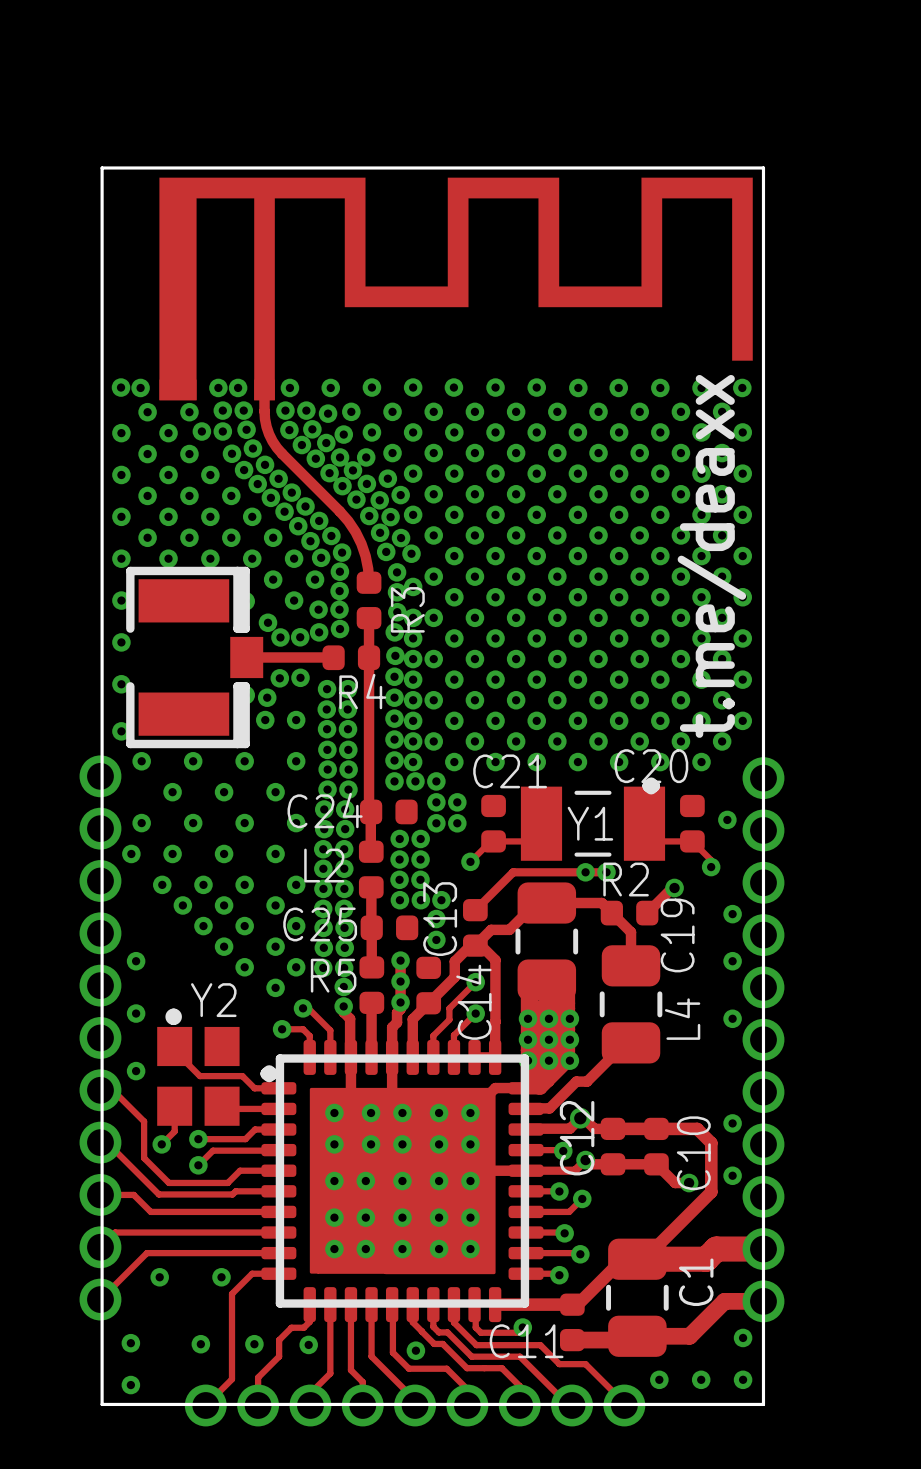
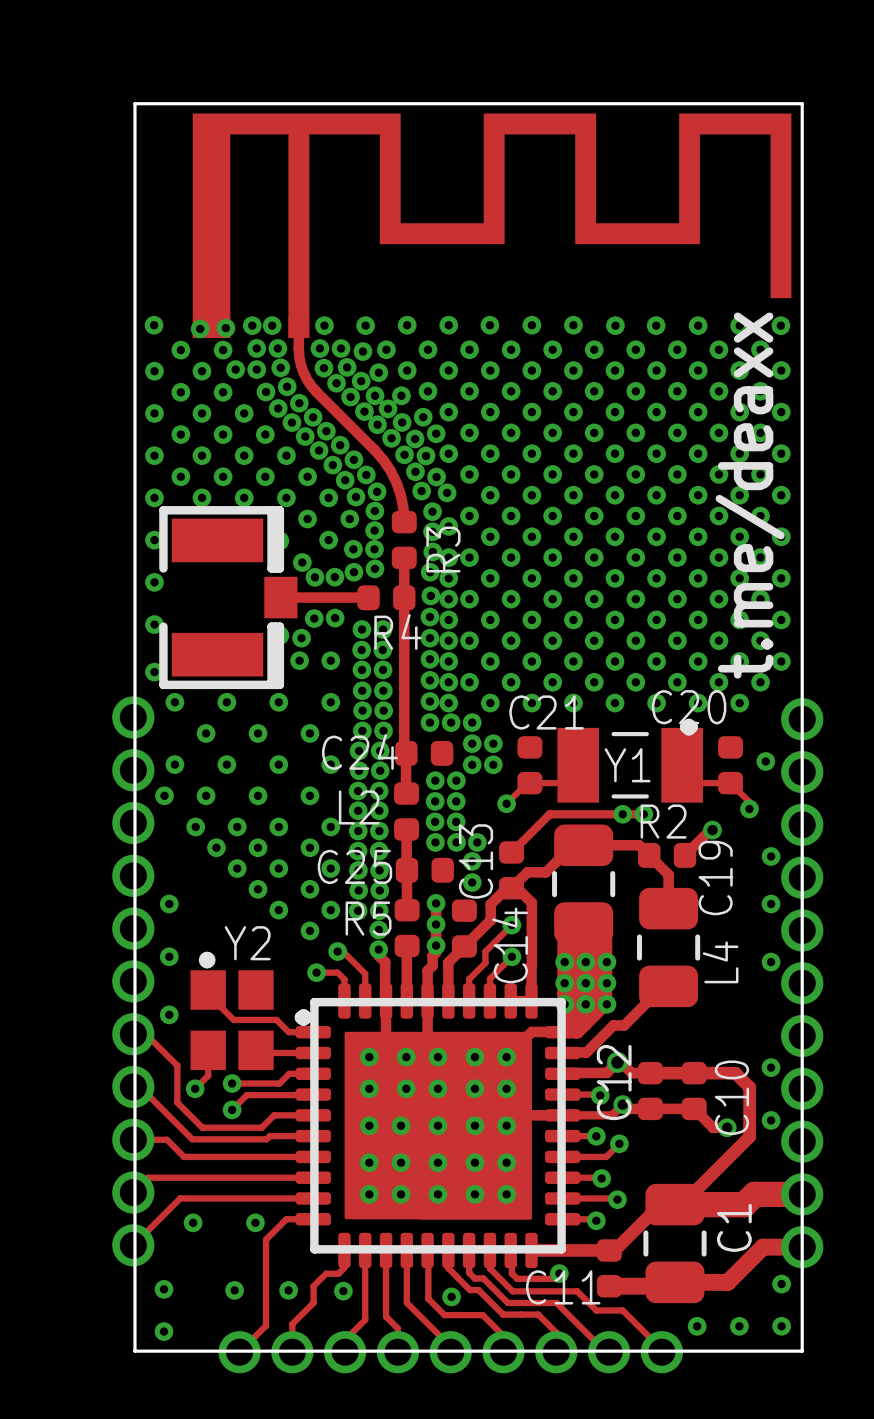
via: (140, 387) -> none
via: none -> (225, 328)
via: none -> (200, 328)

